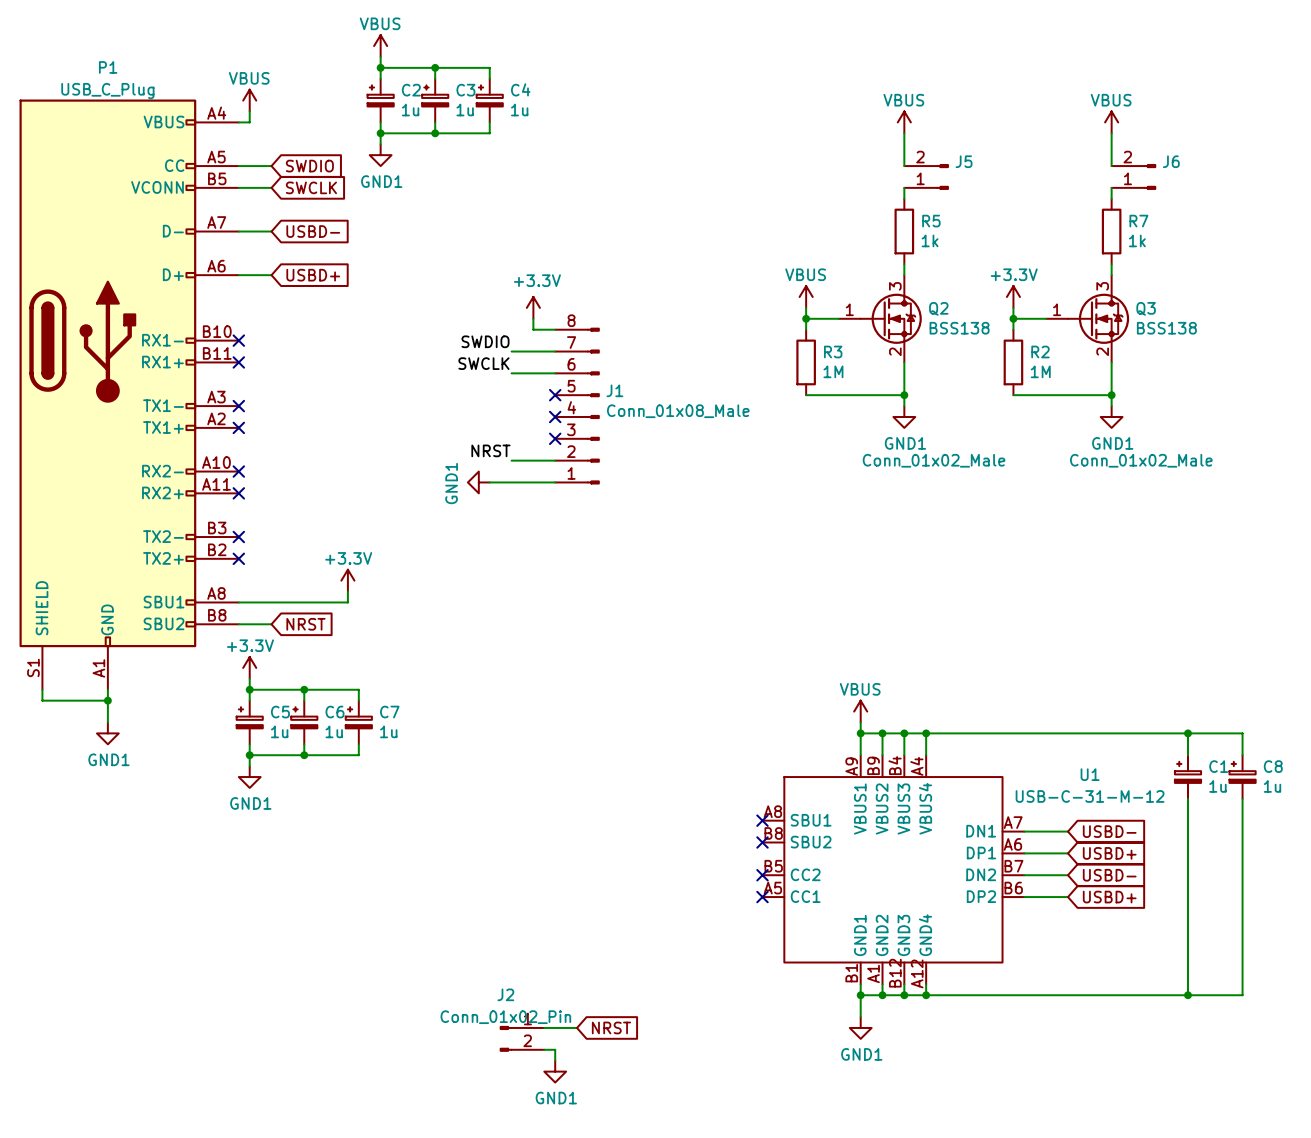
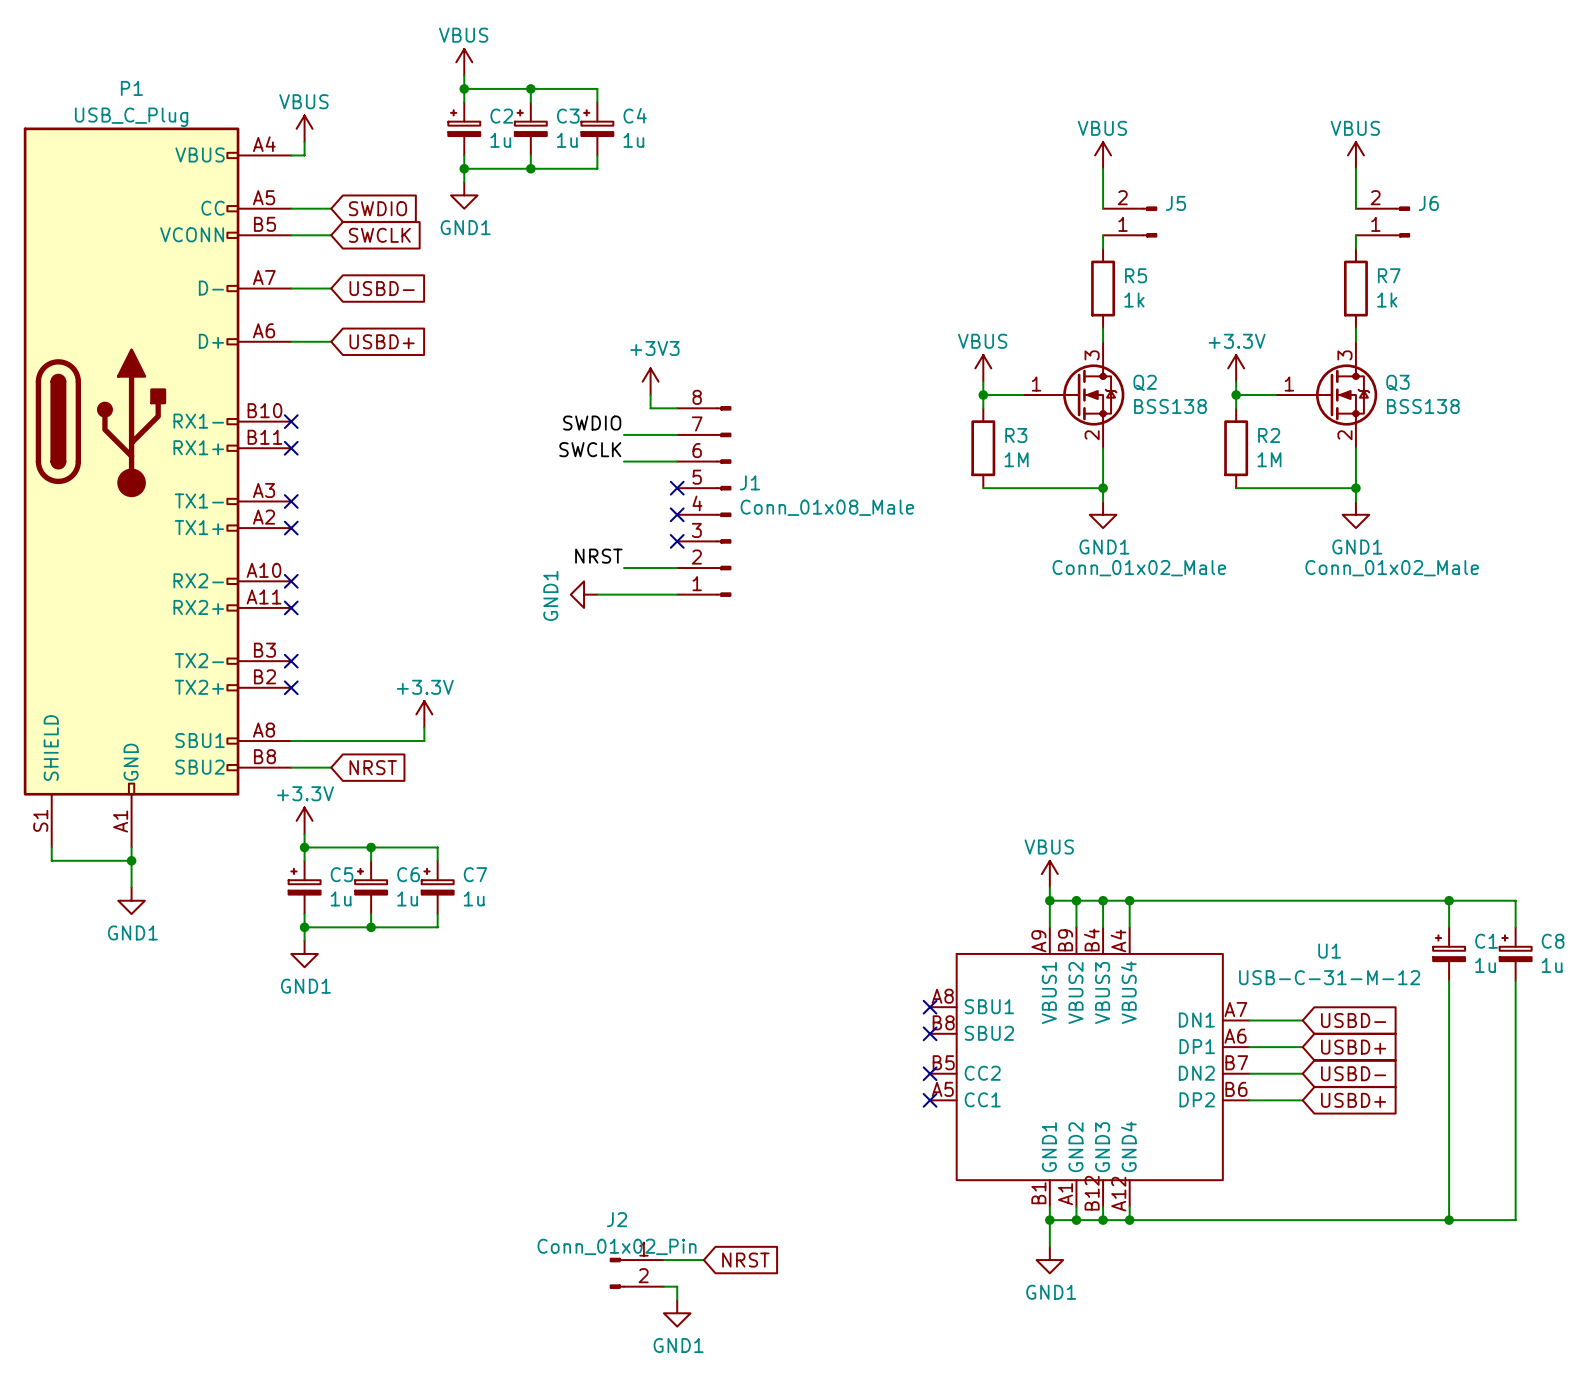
power symbol: +3.3V (533, 307) -> +3V3 (650, 381)

